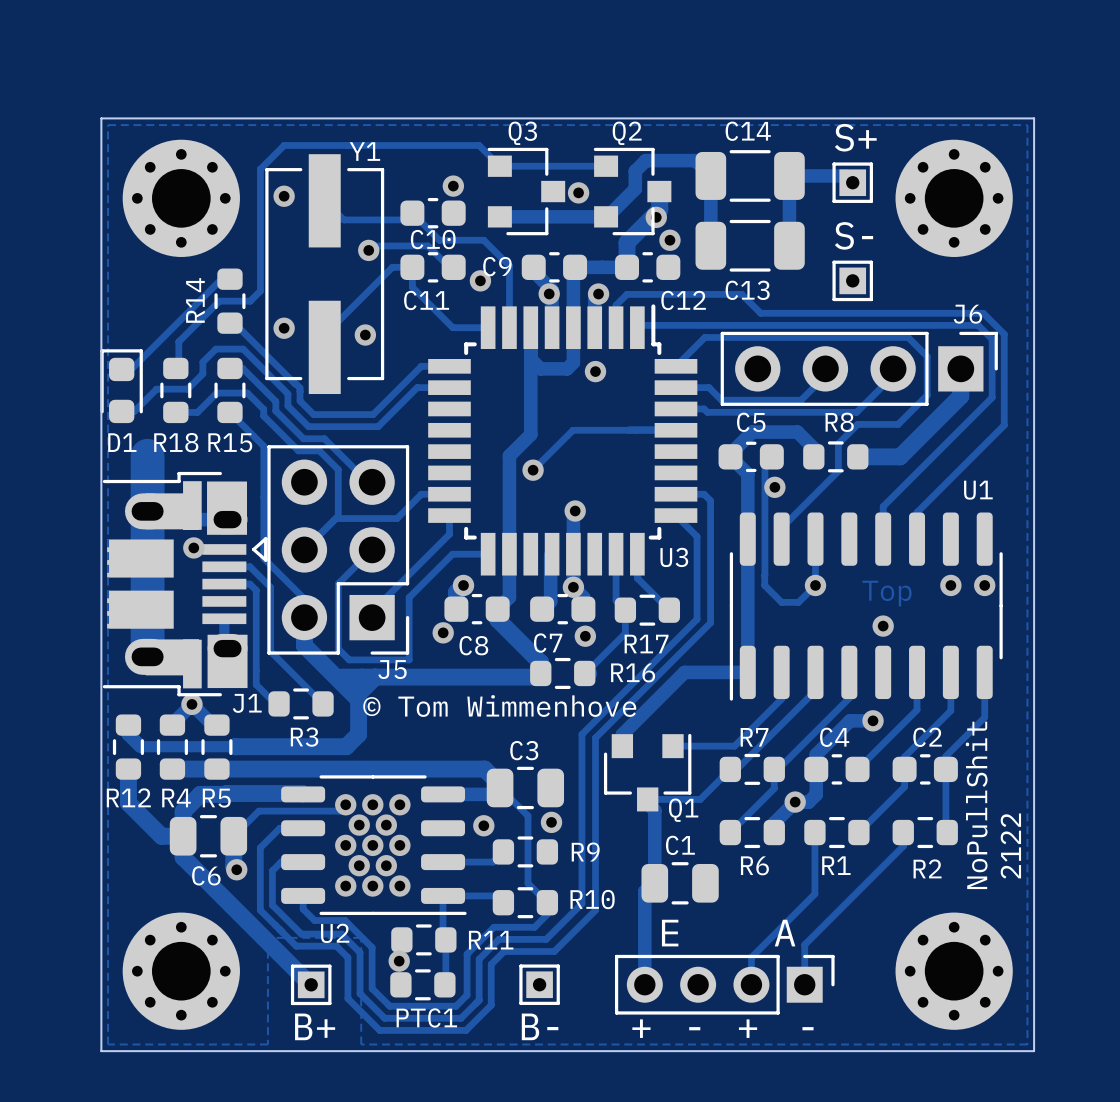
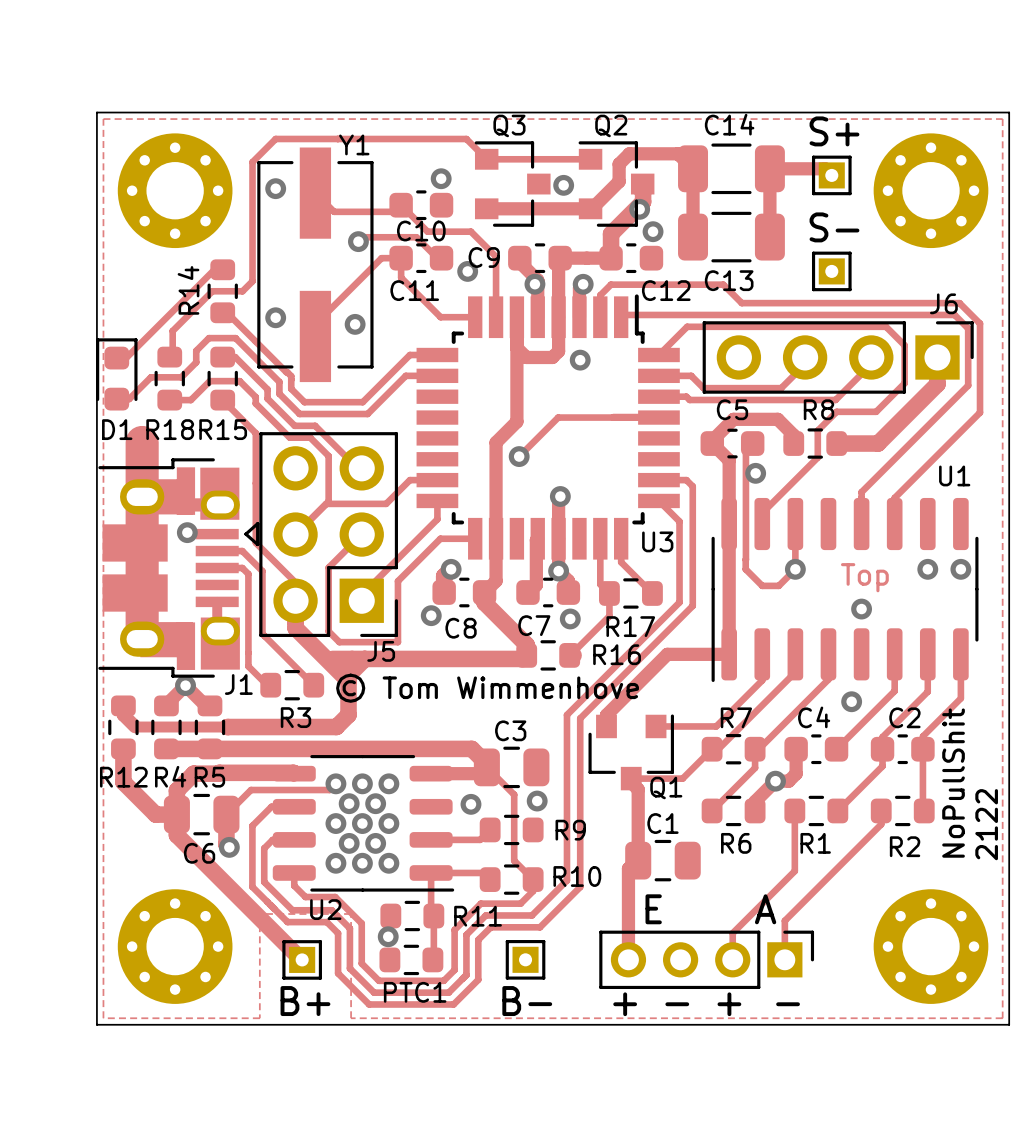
track: (873, 720) (850, 720) (816, 754) (816, 769) -> none

